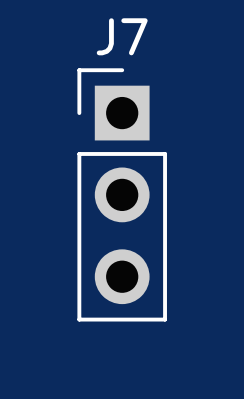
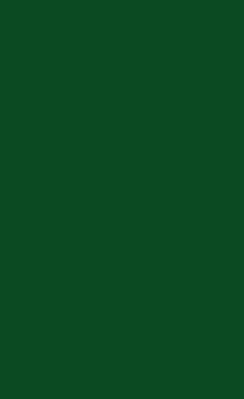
J7: (122, 194) -> none

